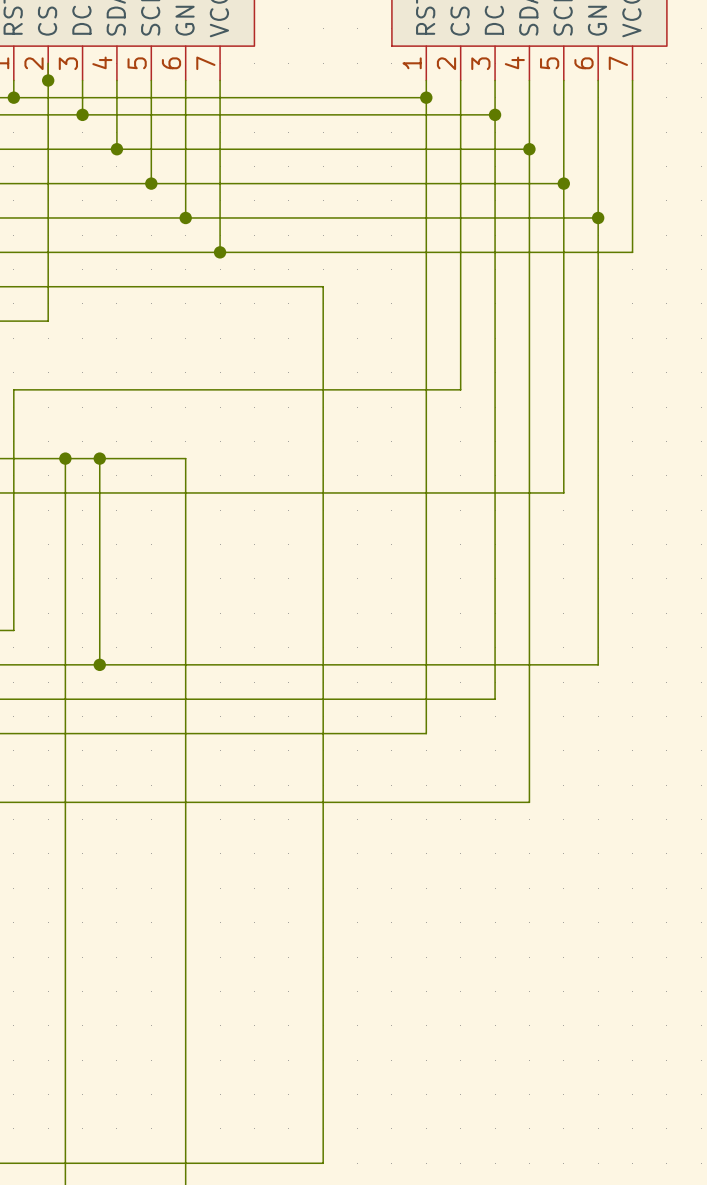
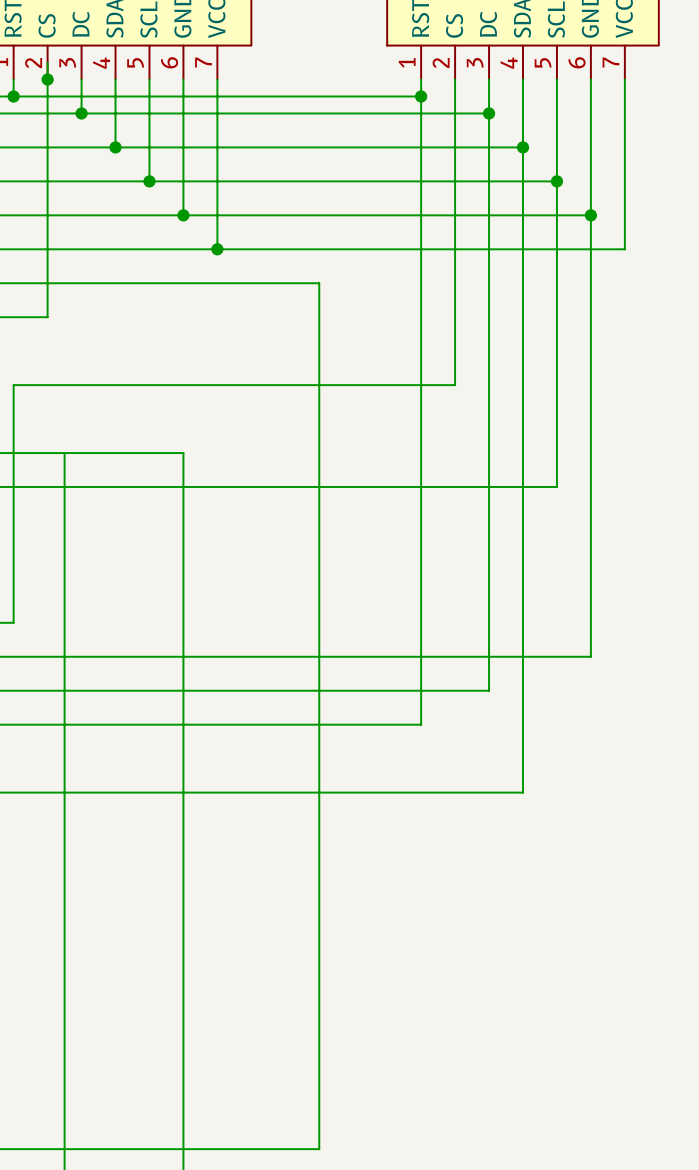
junction: (65, 458) -> none
wire: (99, 458) (99, 664) -> none
junction: (99, 458) -> none
junction: (99, 664) -> none

